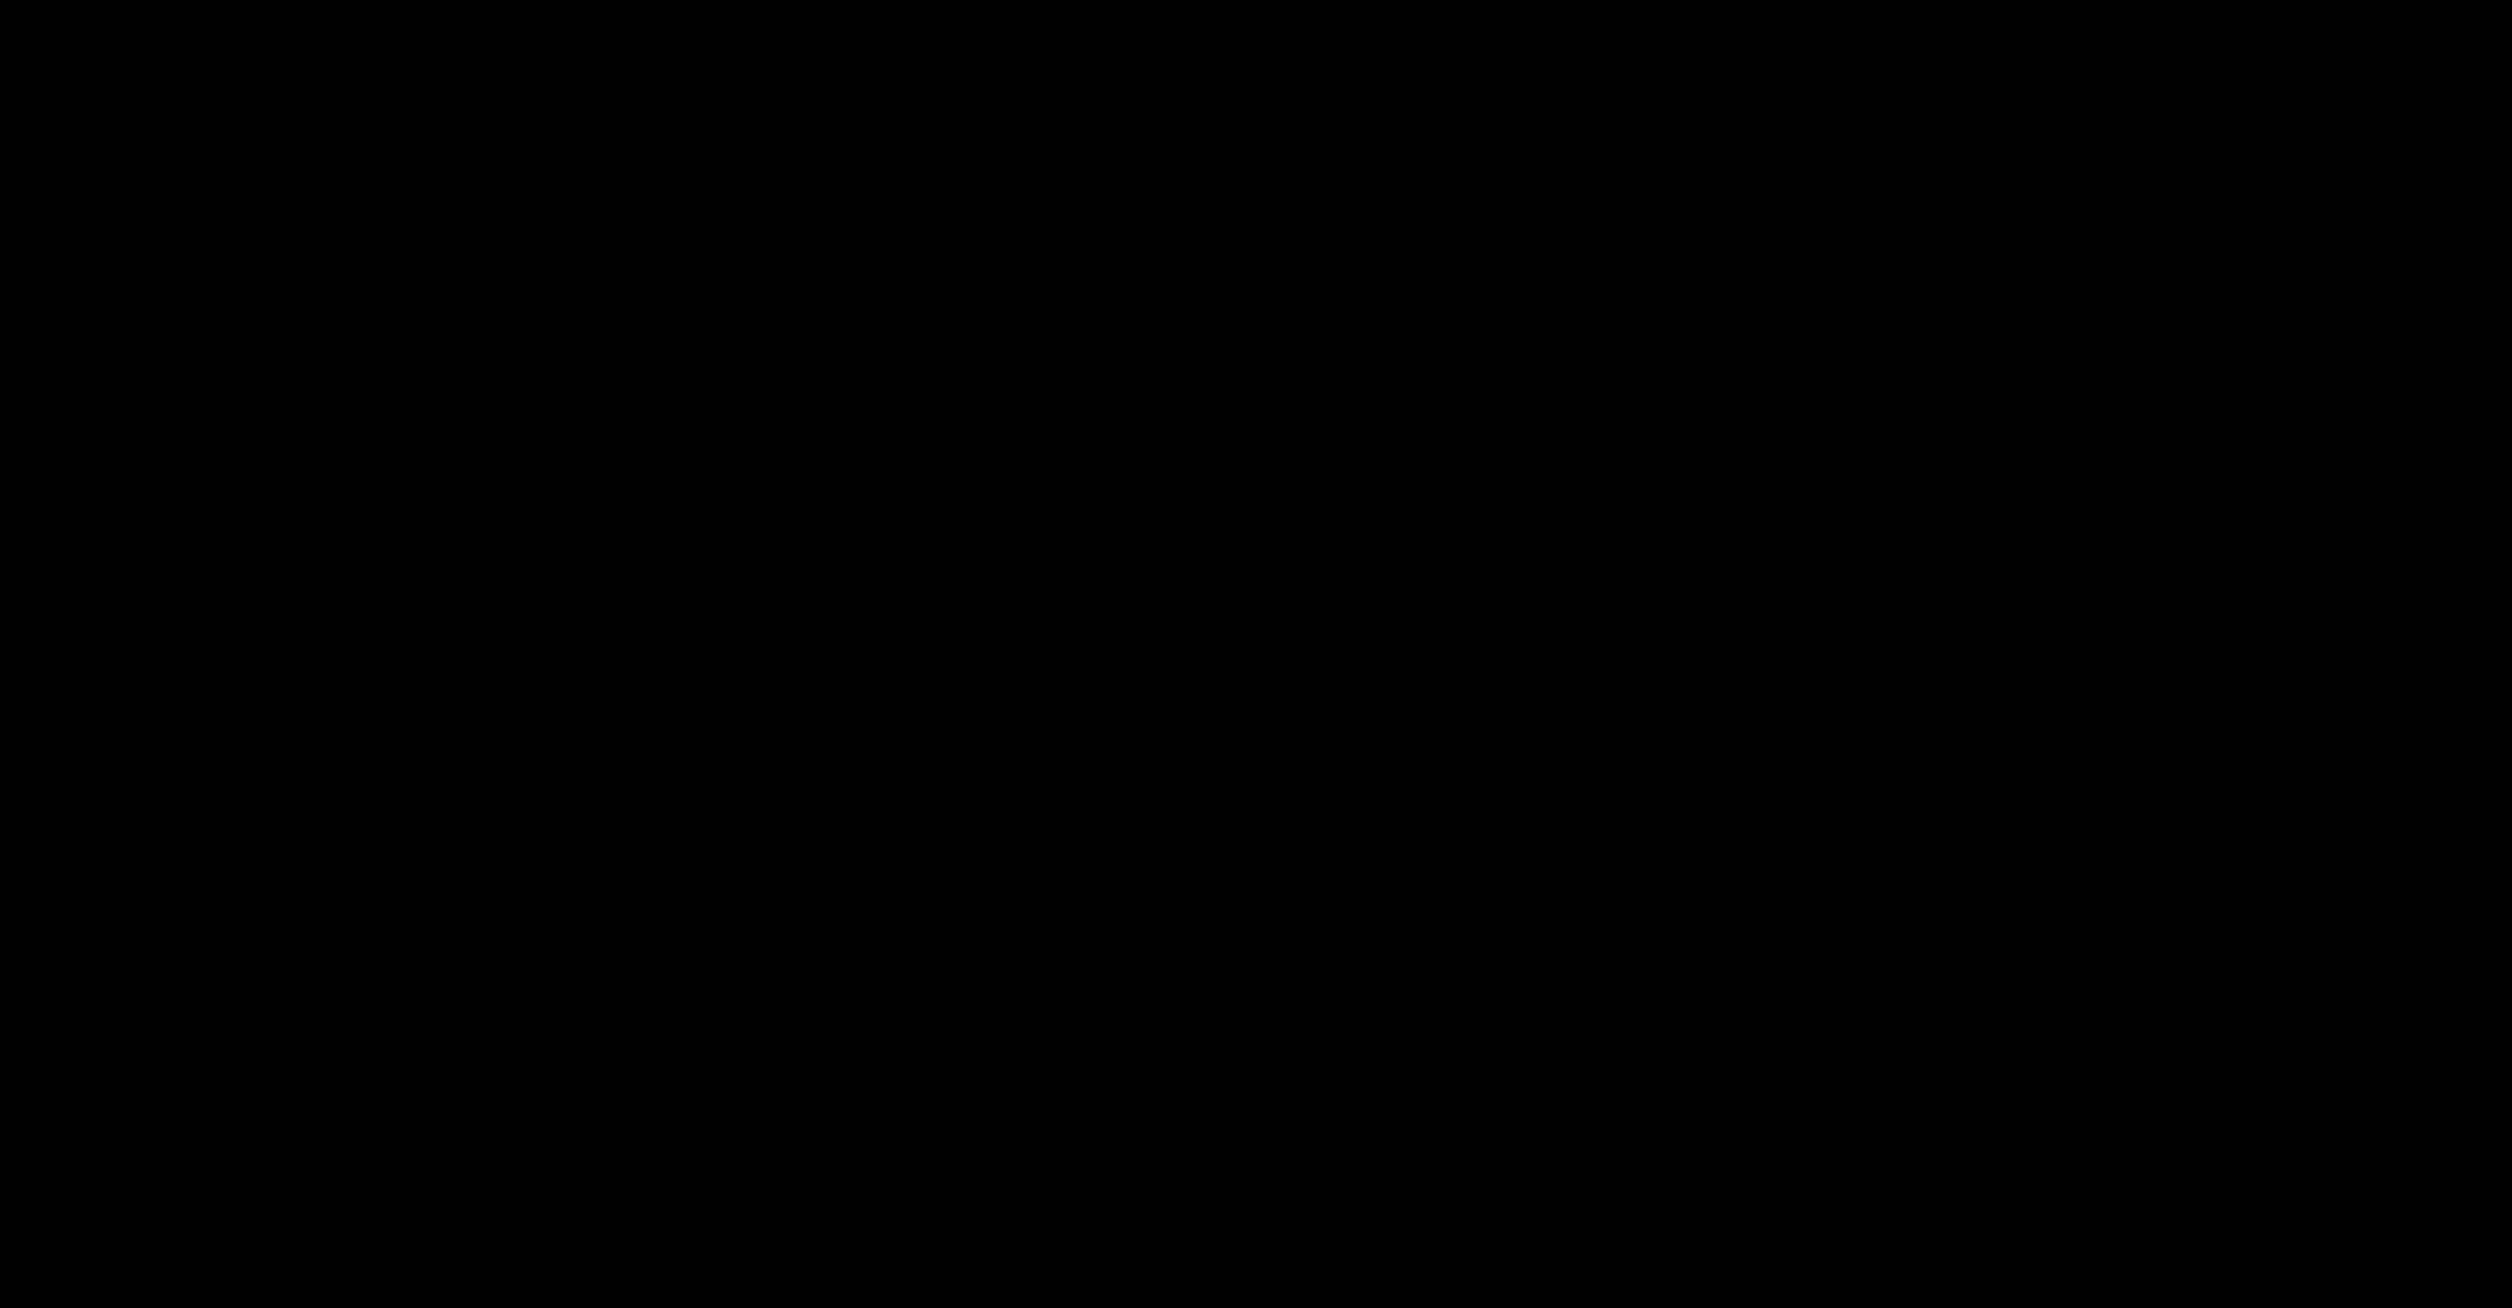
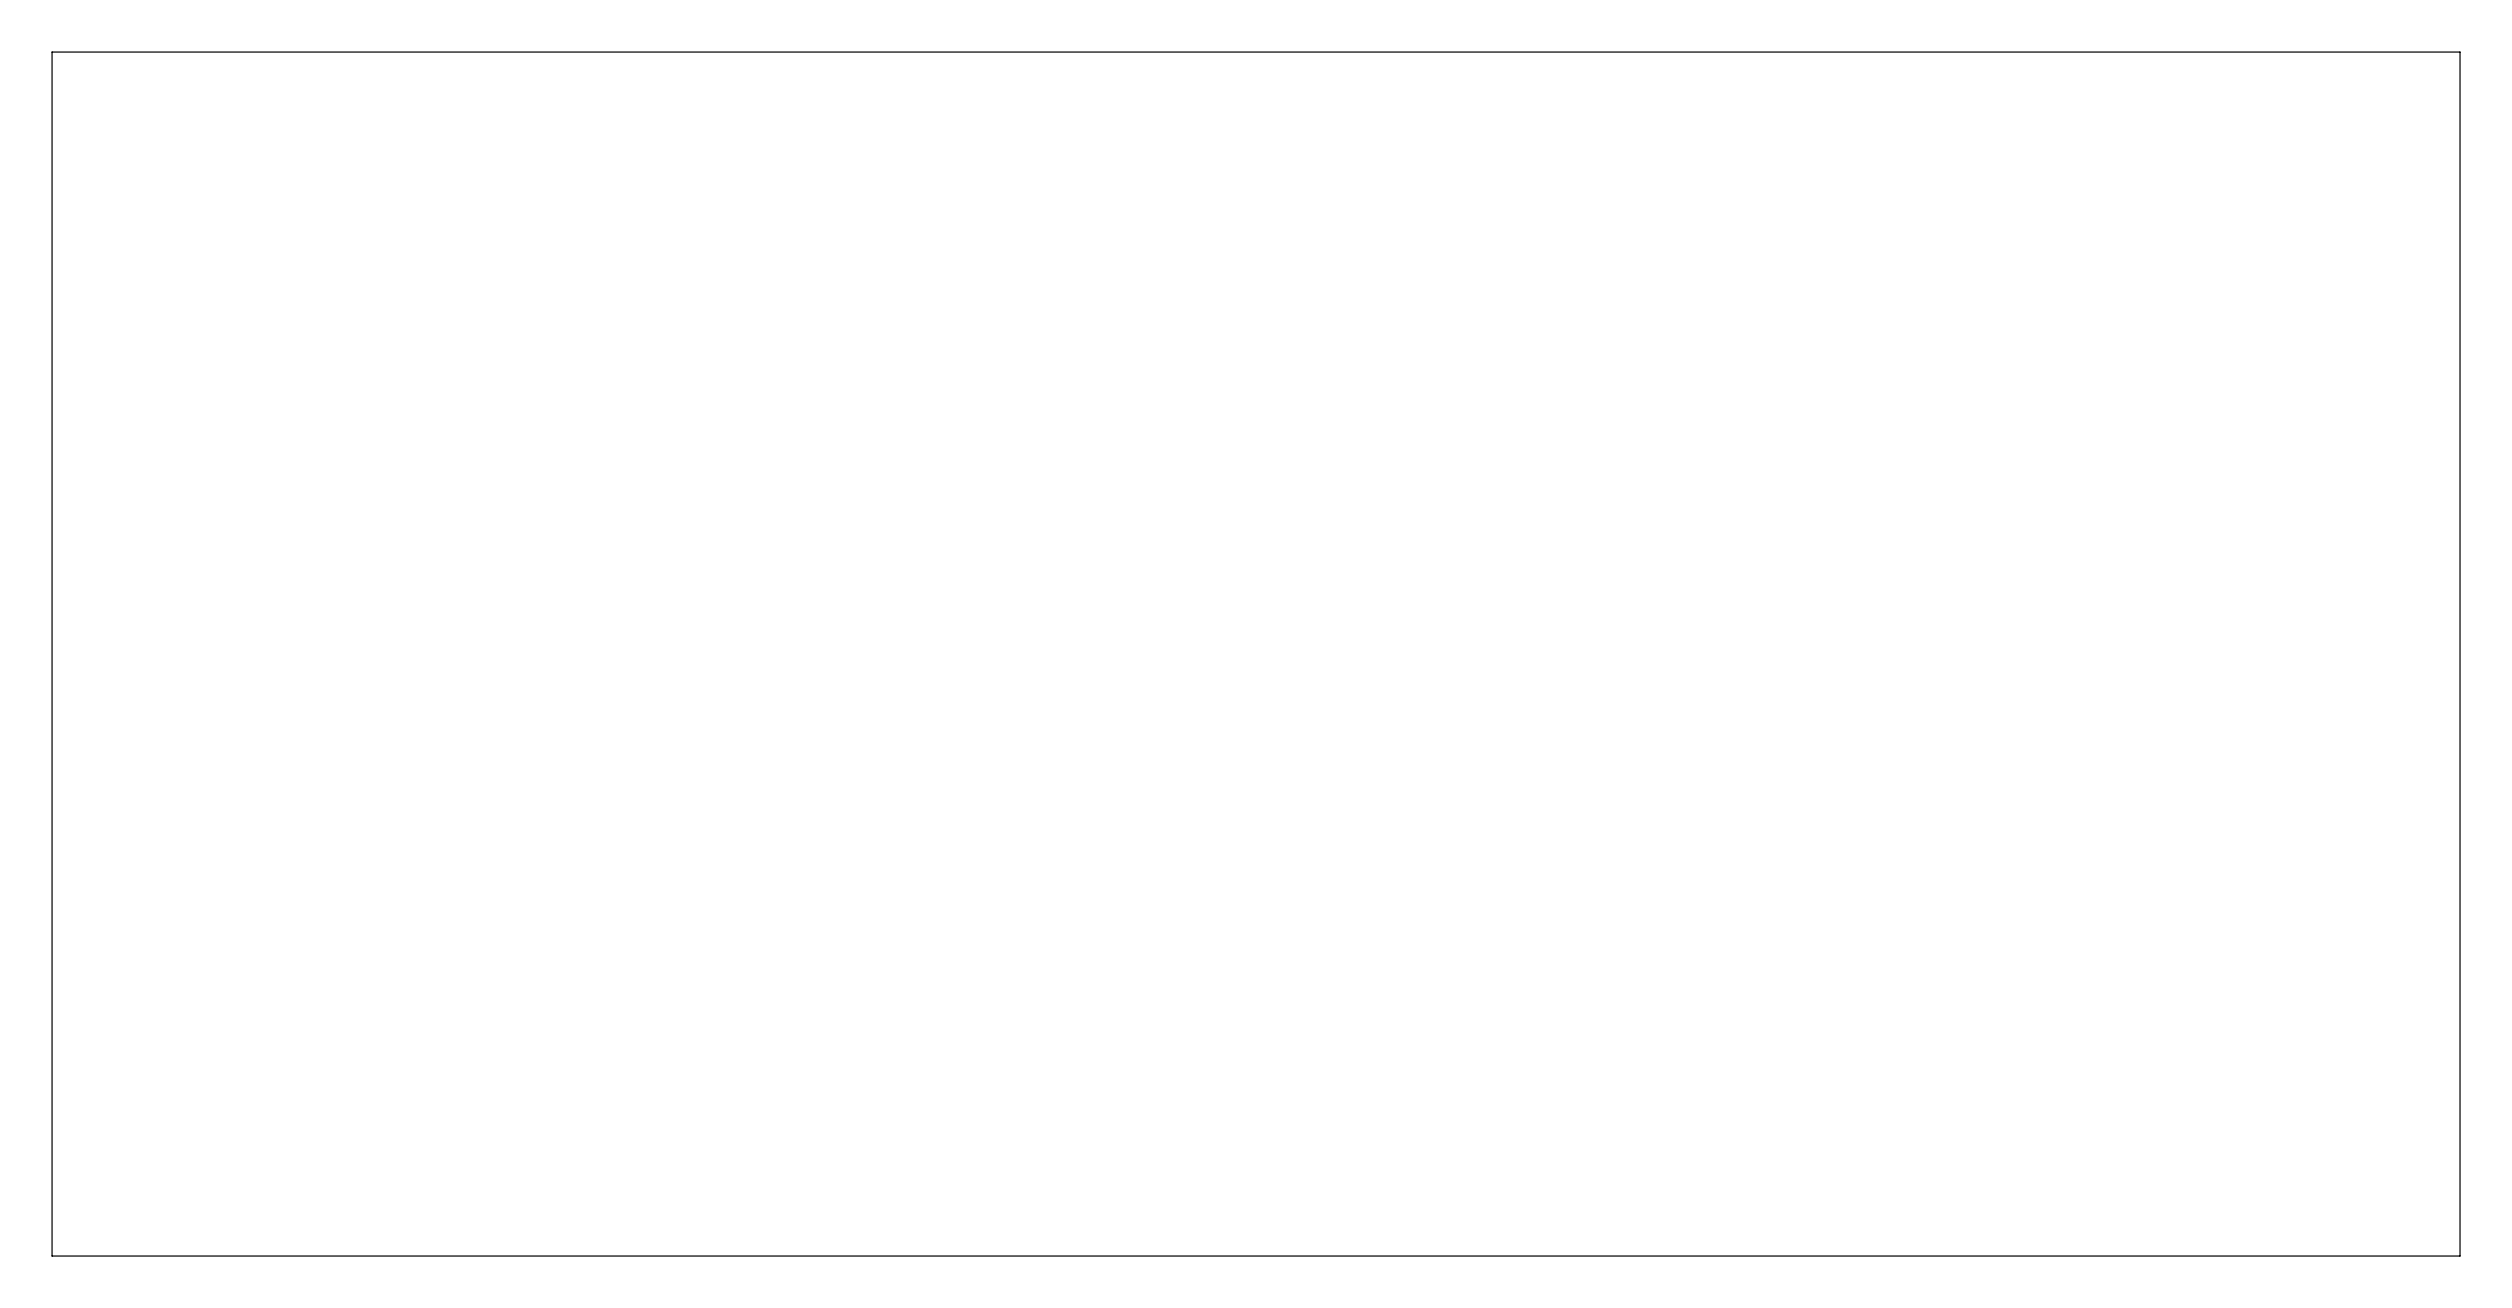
board edge: none -> (2460, 52) (52, 52) (52, 1256) (2460, 1256) (2460, 52)

